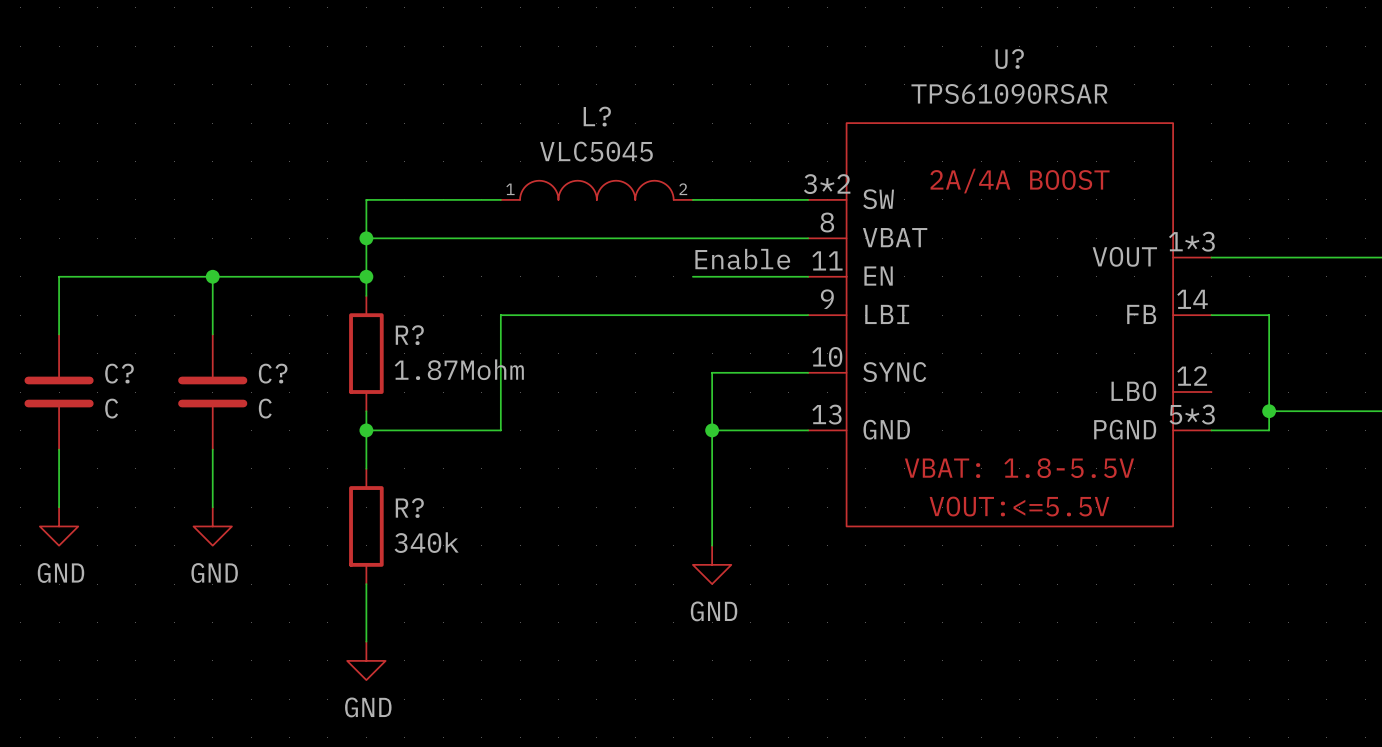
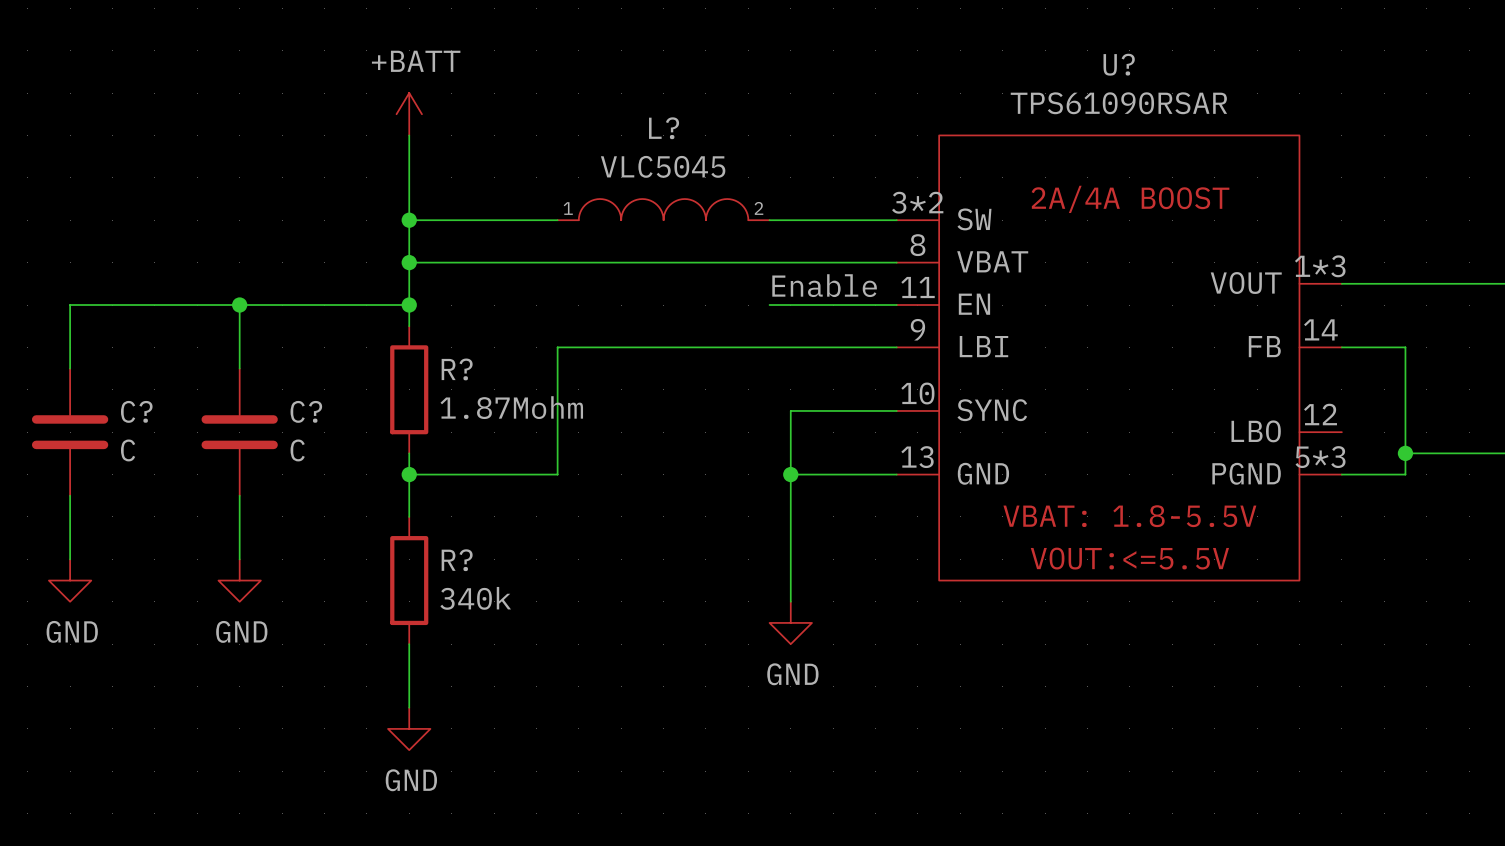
power symbol: none -> +BATT (409, 114)
wire: none -> (409, 135) (409, 220)
junction: none -> (409, 220)

